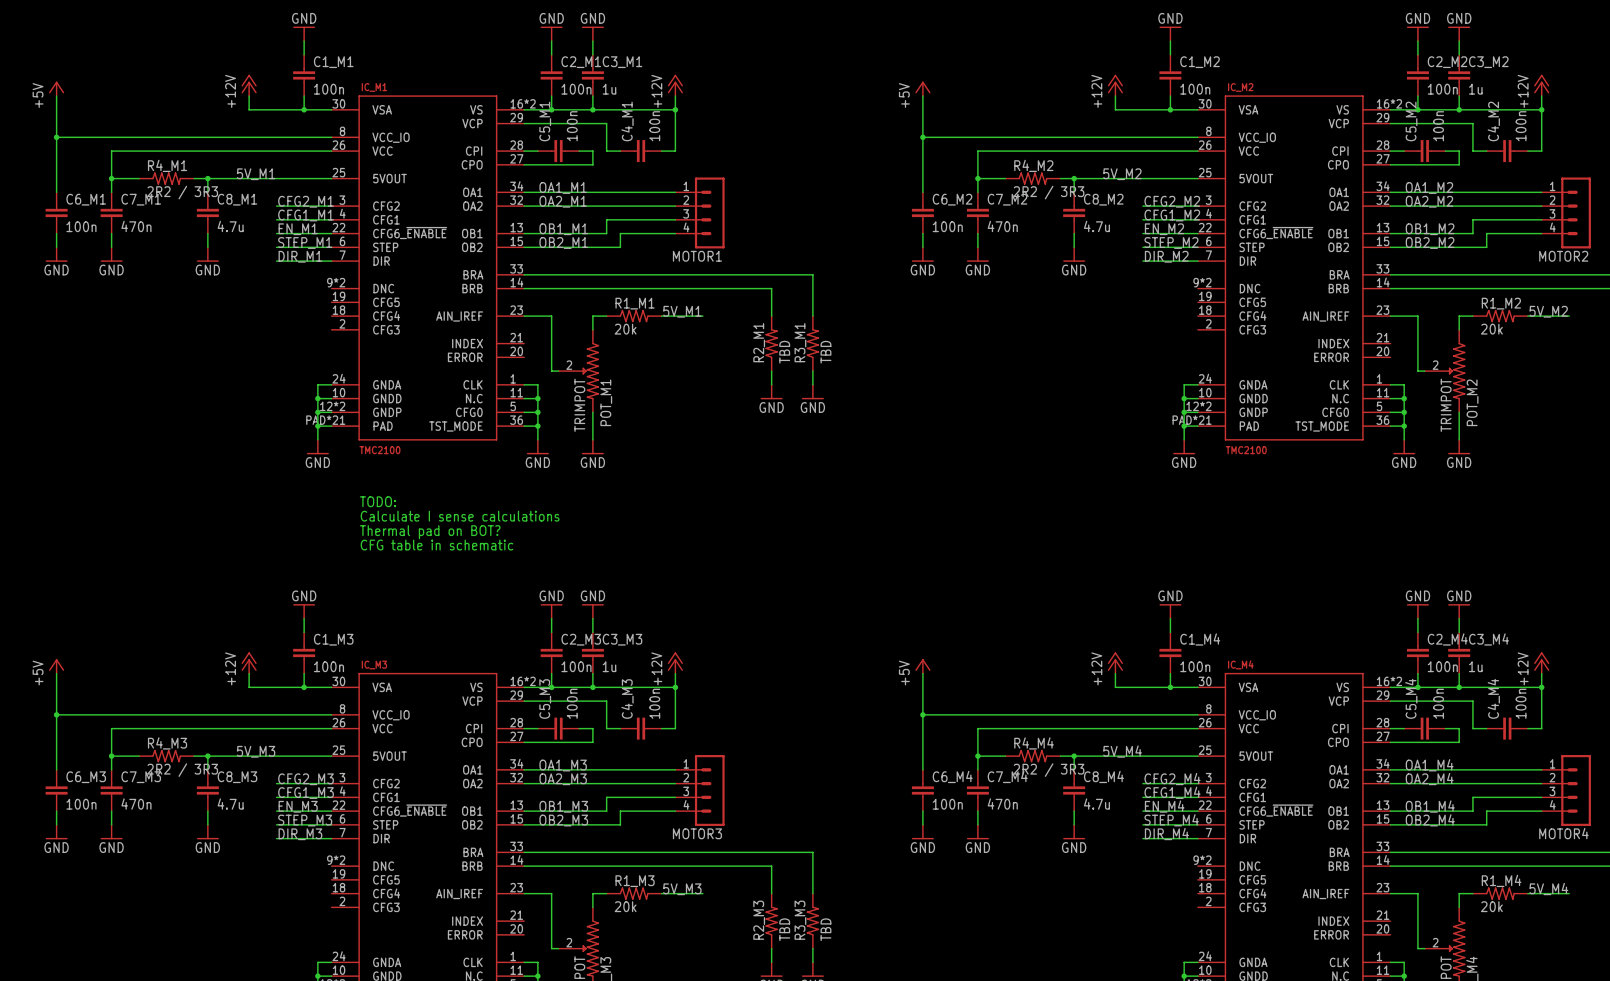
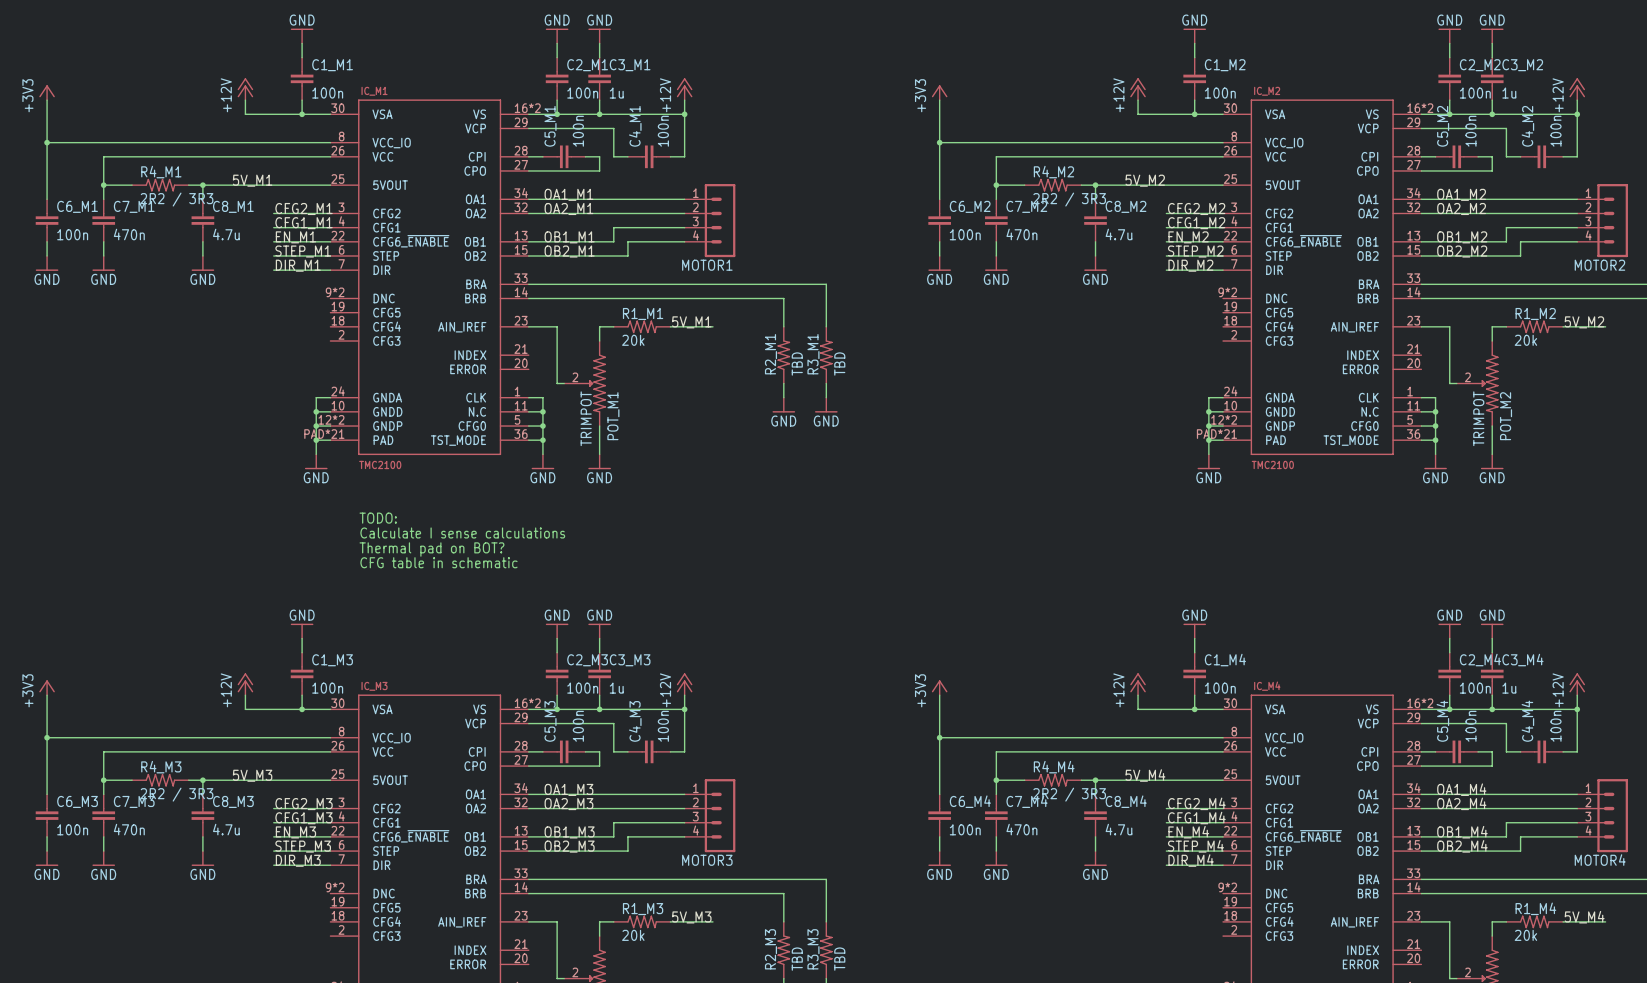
power symbol: +5V (56, 88) -> +3V3 (47, 92)
power symbol: +5V (922, 88) -> +3V3 (939, 92)
power symbol: +5V (56, 666) -> +3V3 (47, 687)
power symbol: +5V (922, 666) -> +3V3 (939, 687)

